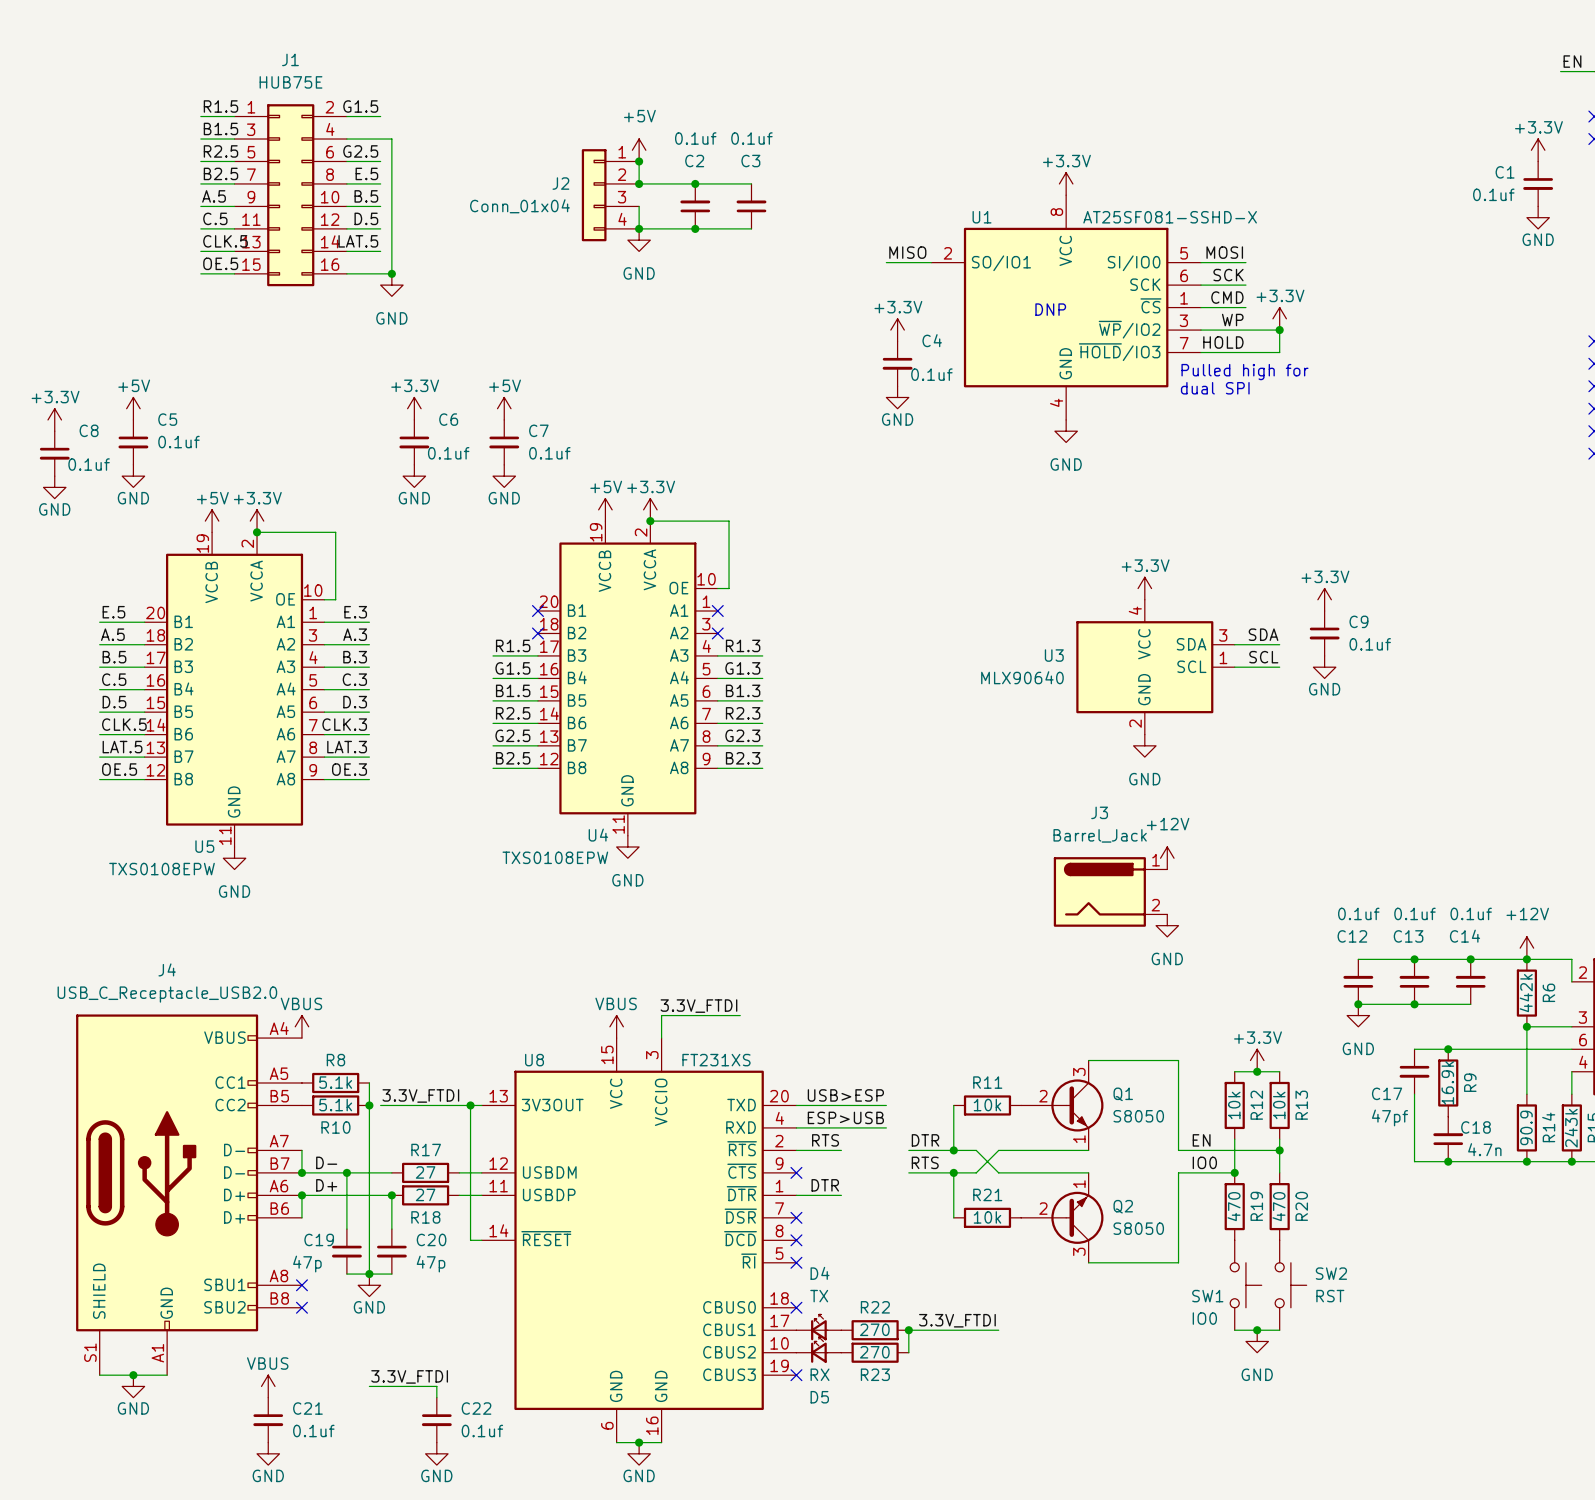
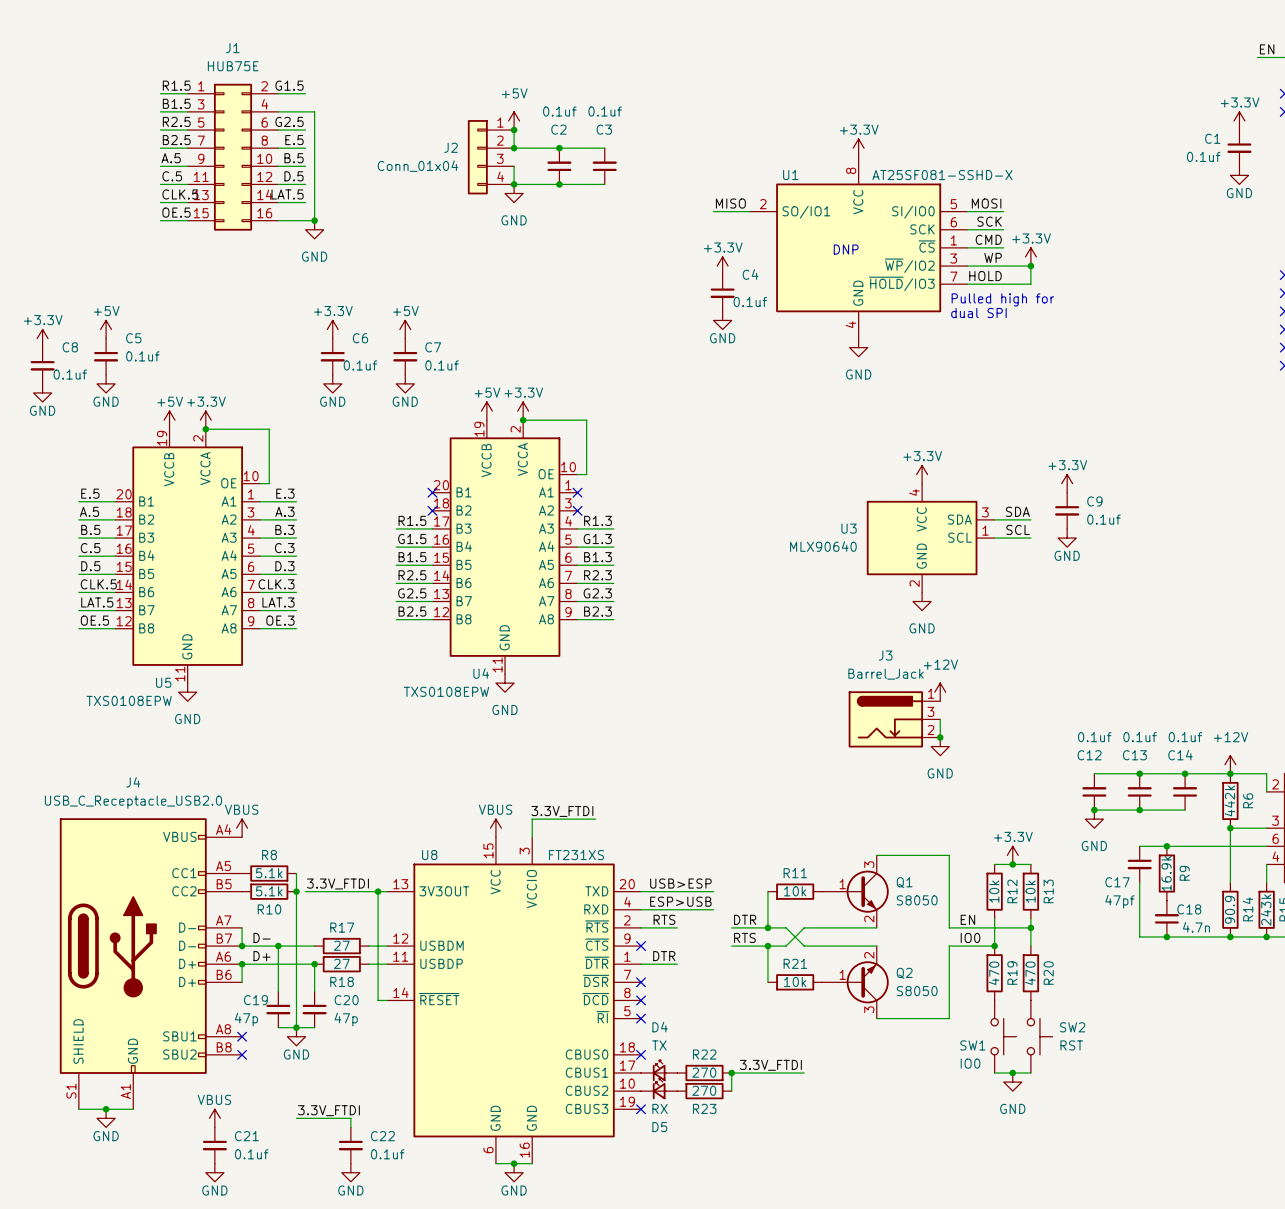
J3 symbol: [1053, 857, 1168, 927] -> [848, 691, 941, 748]
wire: none -> (940, 719) (940, 737)
junction: none -> (940, 737)
Q1 symbol: [1021, 1060, 1104, 1151] -> [822, 855, 889, 928]
Q2 symbol: [1021, 1172, 1104, 1263] -> [822, 946, 889, 1019]

